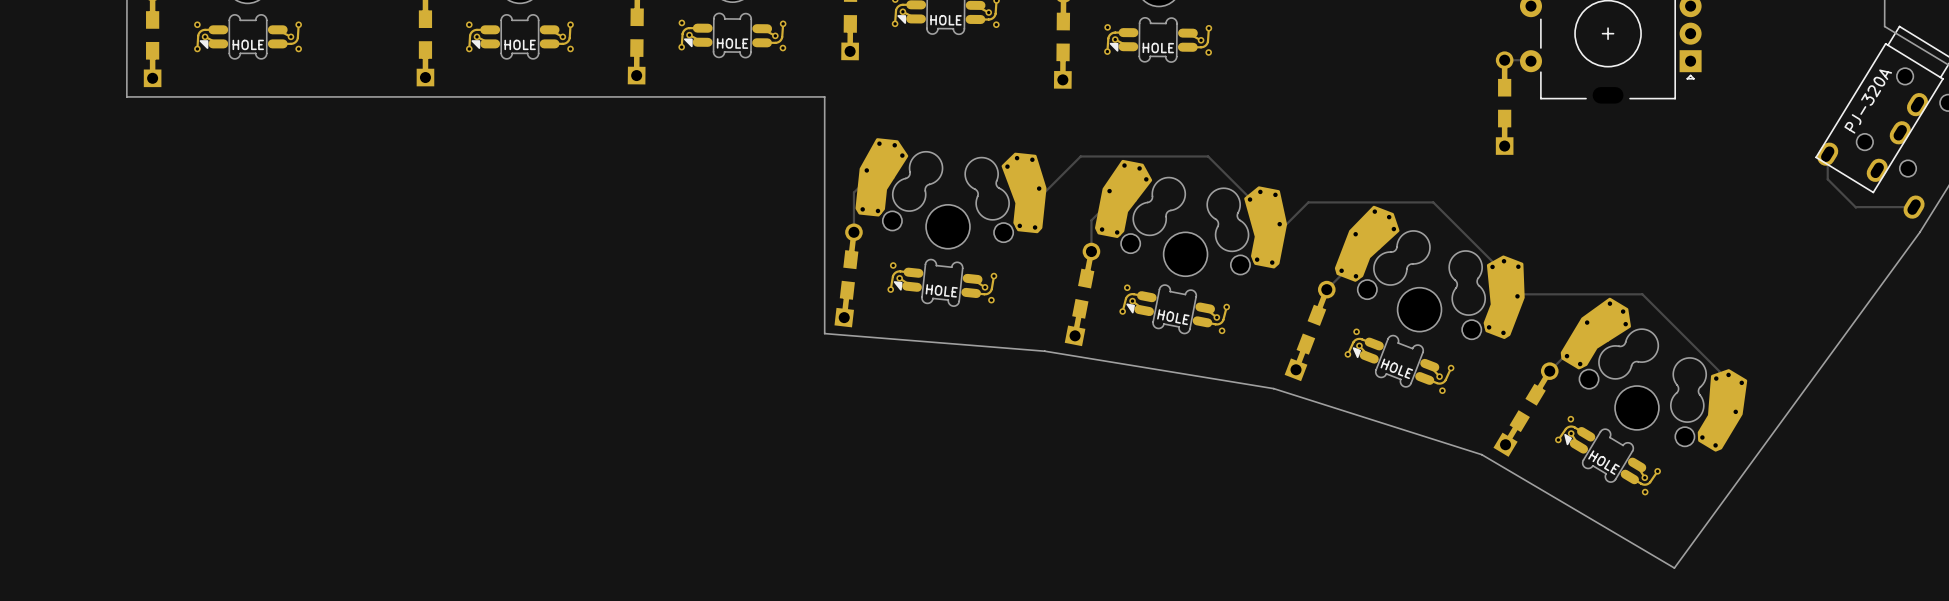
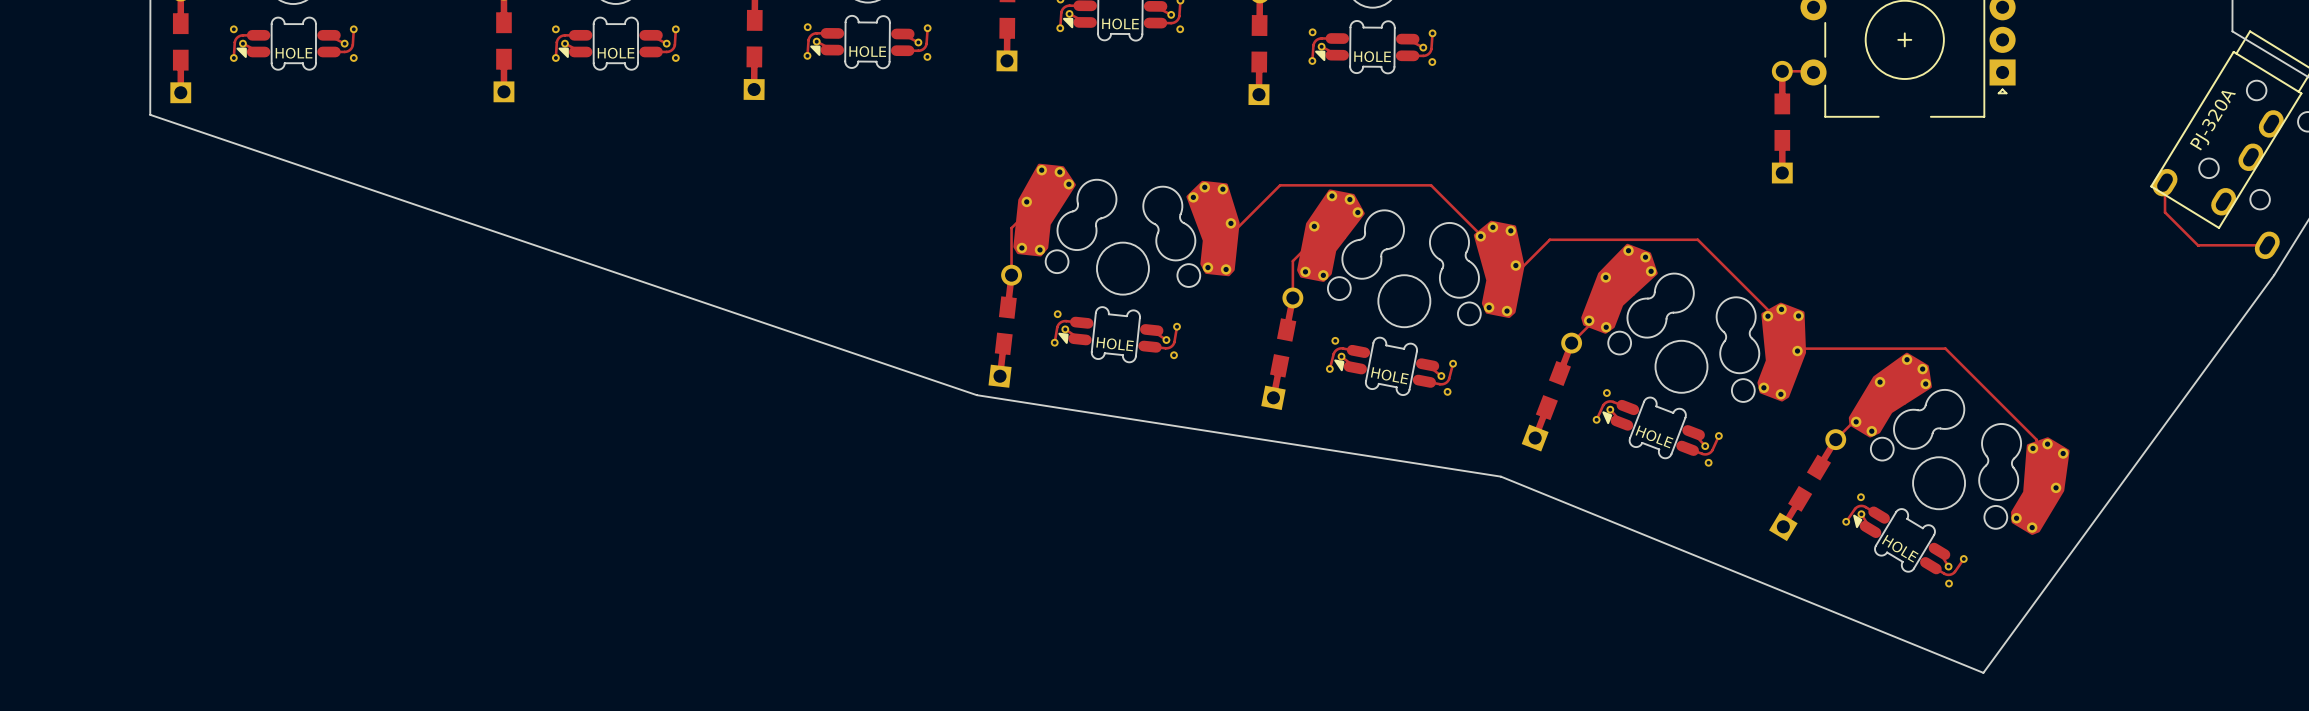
part footprint: [1104, 17, 1213, 63] -> [1308, 20, 1437, 75]
board edge: (126, 96) (824, 96) (824, 333) (1044, 351) (1273, 388) (1481, 454) (1674, 568) -> (150, 114) (976, 395) (1501, 476) (1983, 672)
part footprint: [887, 258, 998, 307] -> [1050, 306, 1181, 363]
part footprint: [1555, 415, 1661, 496] -> [1842, 493, 1968, 588]

